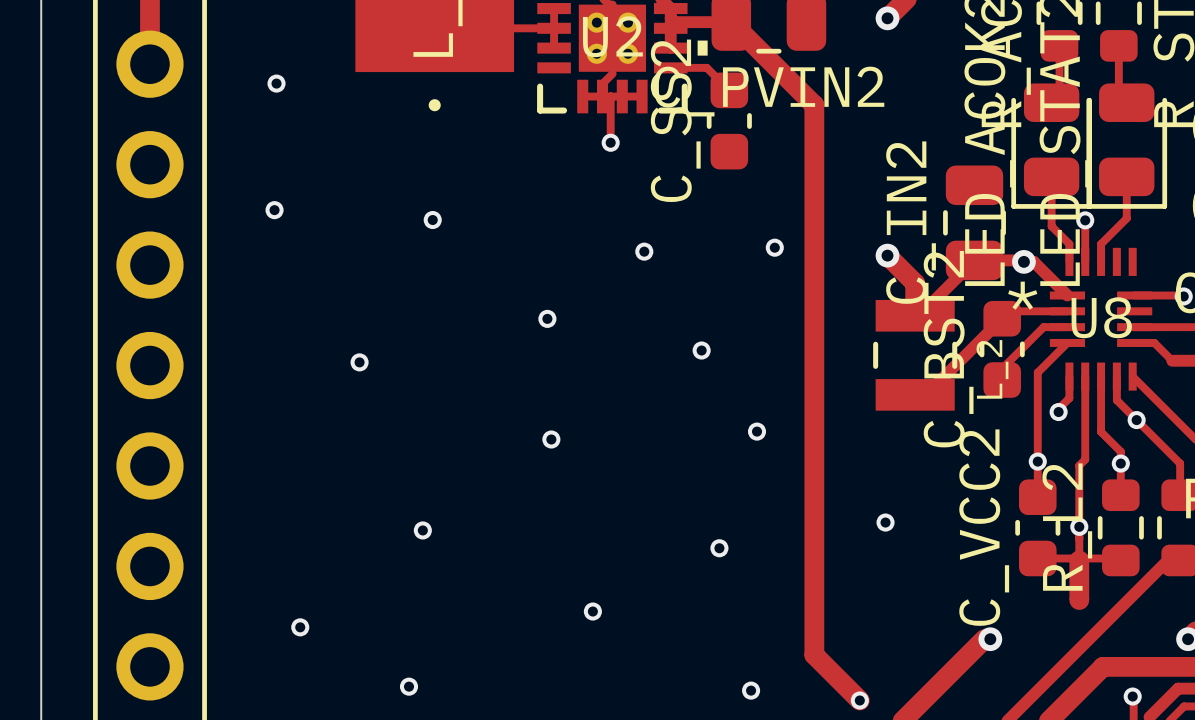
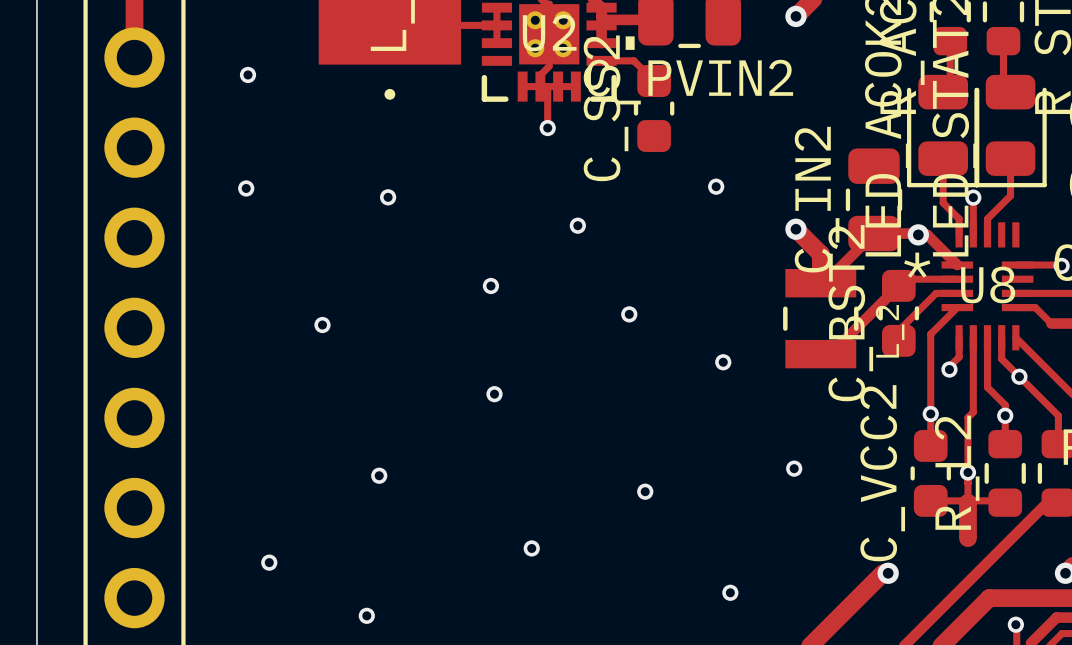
track: (731, 22) (814, 105) (814, 655) (859, 700) -> none
via position: (774, 247) -> (716, 186)
via position: (757, 431) -> (723, 362)
via: none -> (730, 592)
via: (751, 690) -> none
via: (859, 700) -> none

